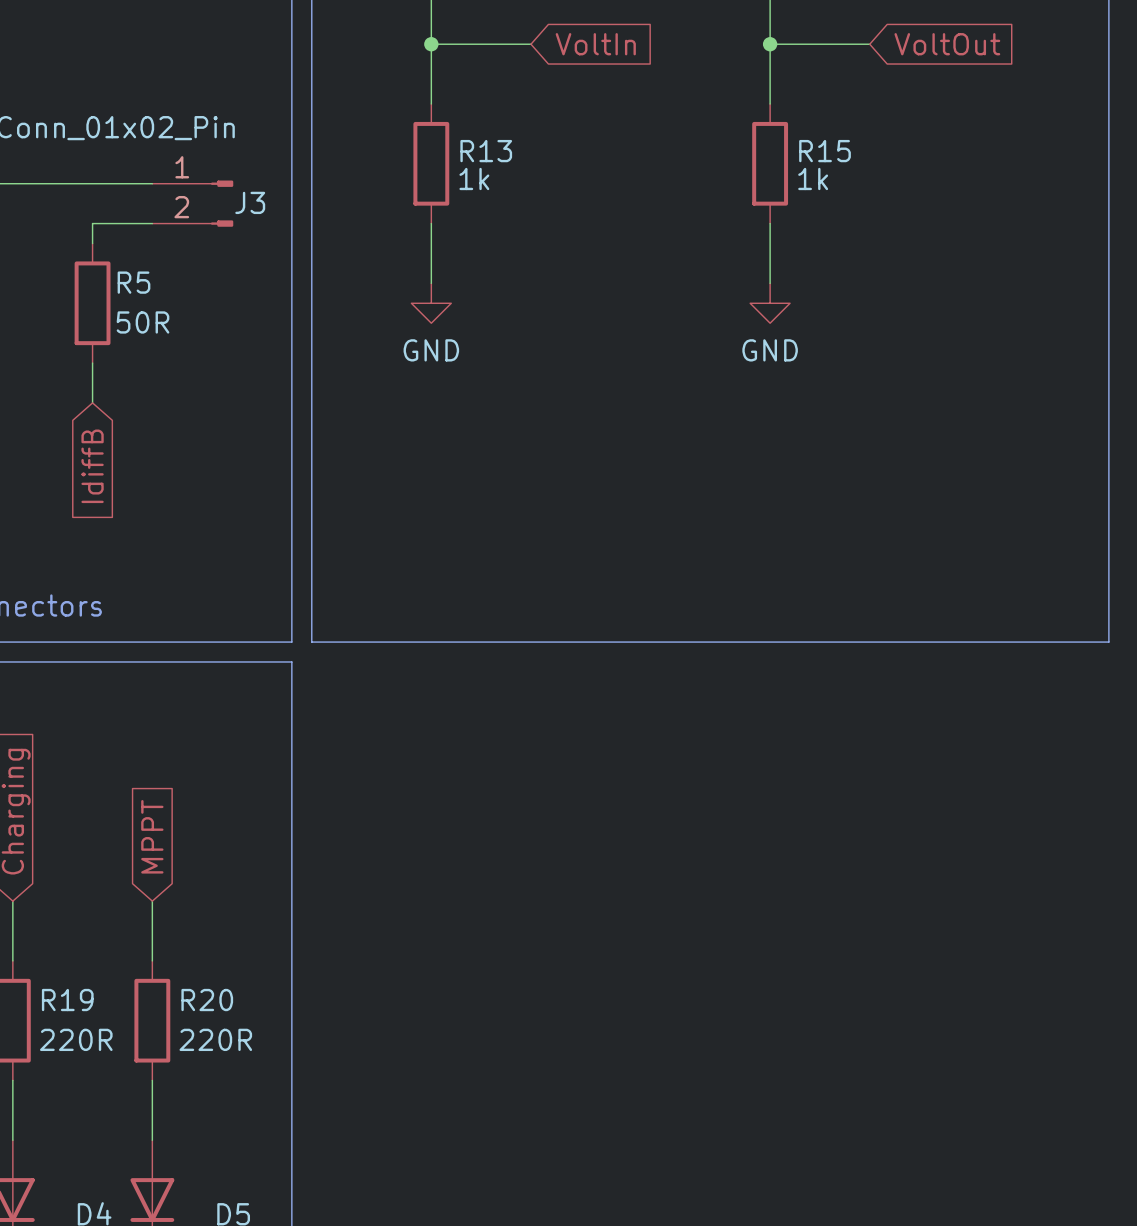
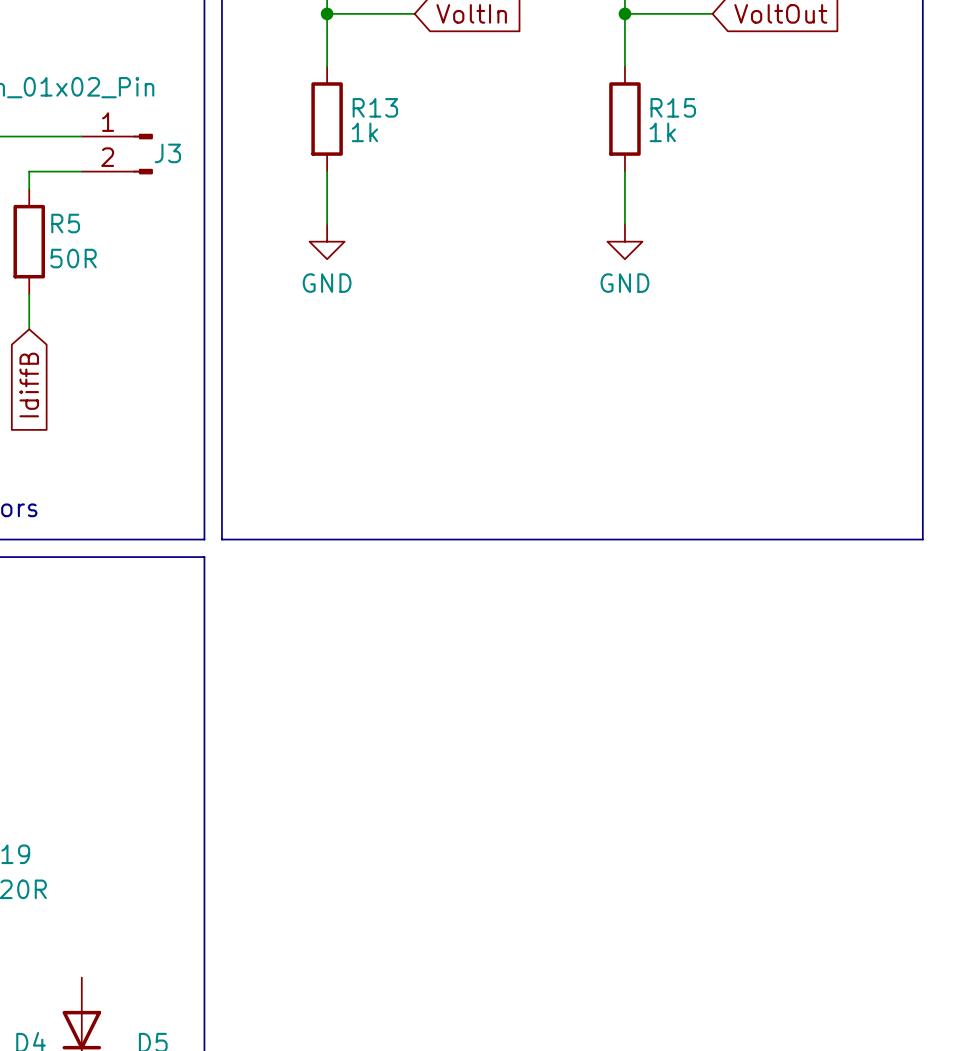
global label: MPPT (152, 836) -> none
wire: (152, 901) (152, 960) -> none
R20: 220R (152, 1020) -> none
wire: (152, 1080) (152, 1140) -> none

